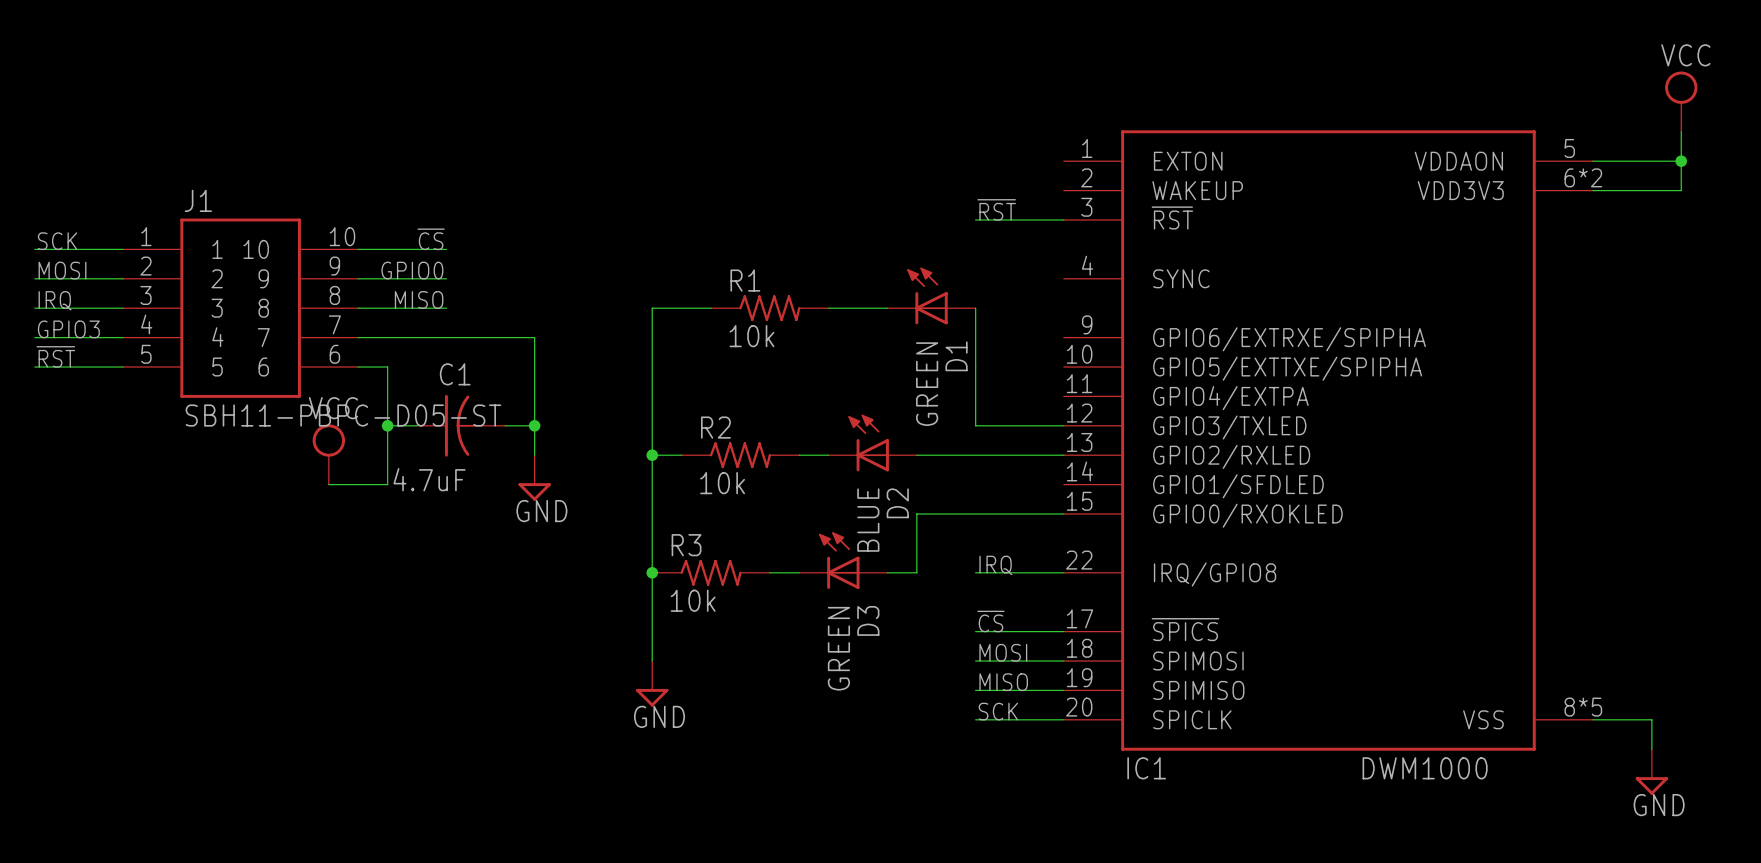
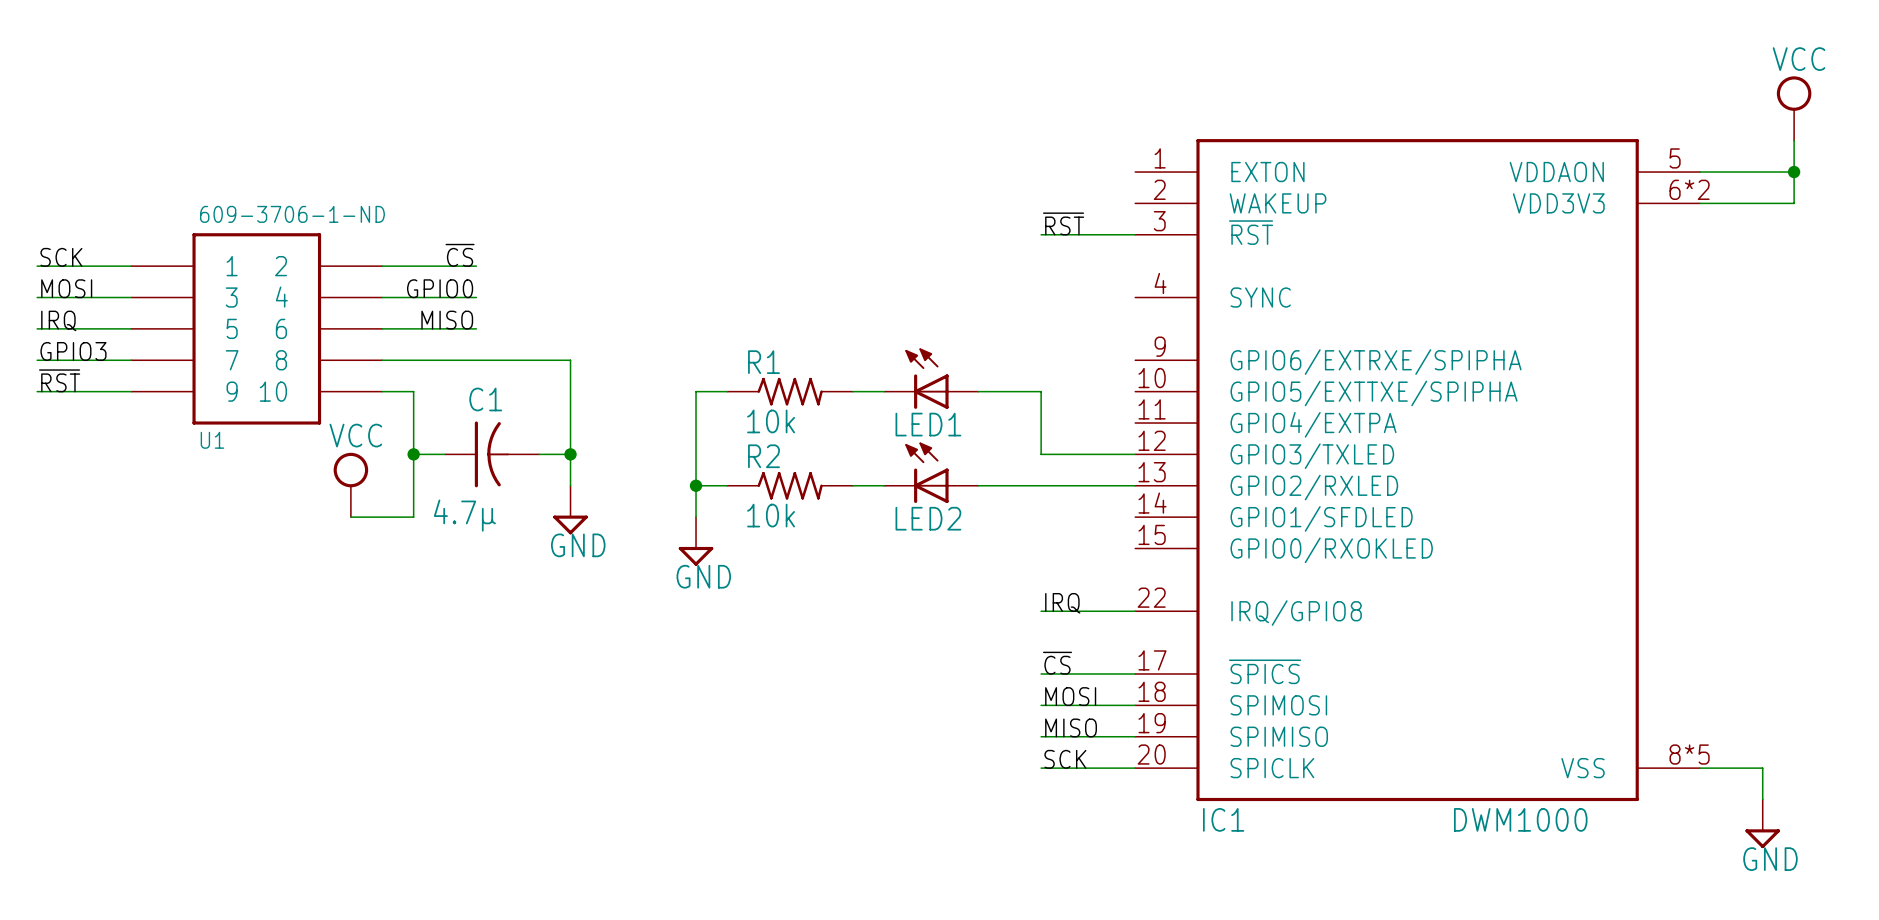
J1 name: J1 (198, 200) -> U1 (212, 440)
J1 symbol: [123, 218, 359, 398] -> [131, 233, 383, 425]
D1: GREEN (931, 296) -> none
wire: (711, 308) (652, 308) (652, 367) -> (727, 391) (696, 391)
R1 position: (769, 308) -> (790, 391)
wire: (828, 308) (887, 308) -> none
wire: (975, 308) (975, 367) -> (978, 391) (1041, 391)
LED1: none -> (931, 378)
J1 value: SBH11-PBPC-D05-ST (343, 415) -> 609-3706-1-ND (292, 214)
C1 value: 4.7uF (429, 479) -> 4.7µ (464, 515)
wire: (652, 484) (652, 661) -> none
D2 name: D2 (897, 503) -> LED2 (928, 518)
wire: (1063, 514) (916, 514) (916, 572) (887, 572) -> none
D2 value: BLUE (868, 520) -> none
D3: GREEN (843, 560) -> none
junction: (652, 572) -> none
R3: 10k (711, 572) -> none
wire: (769, 572) (799, 572) -> (852, 391) (884, 391)
power symbol position: GND (652, 683) -> GND (696, 541)

